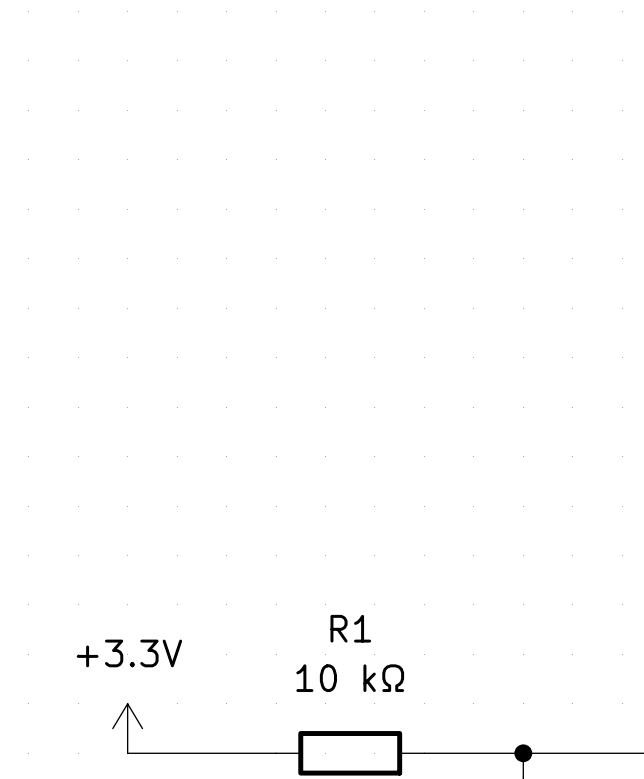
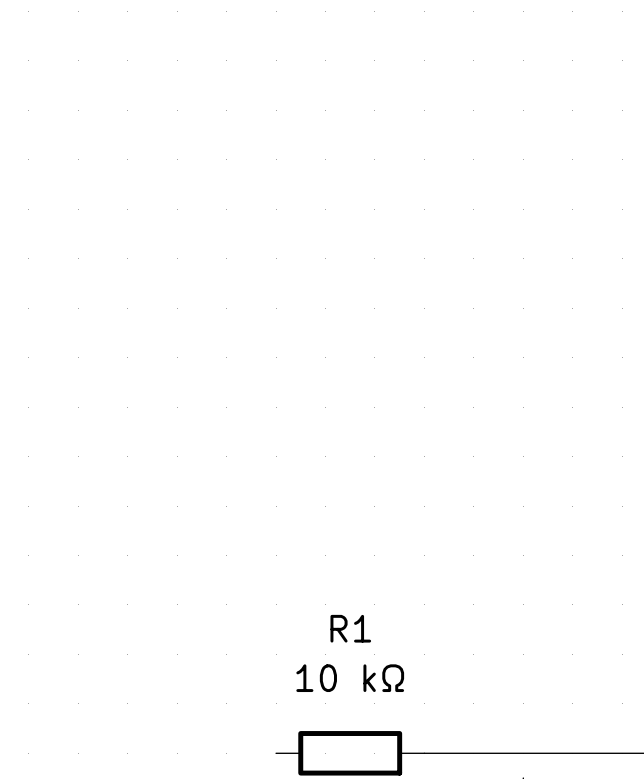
power symbol: +3.3V (127, 728) -> none
wire: (127, 753) (276, 753) -> none
wire: (523, 753) (523, 778) -> none
junction: (523, 753) -> none

